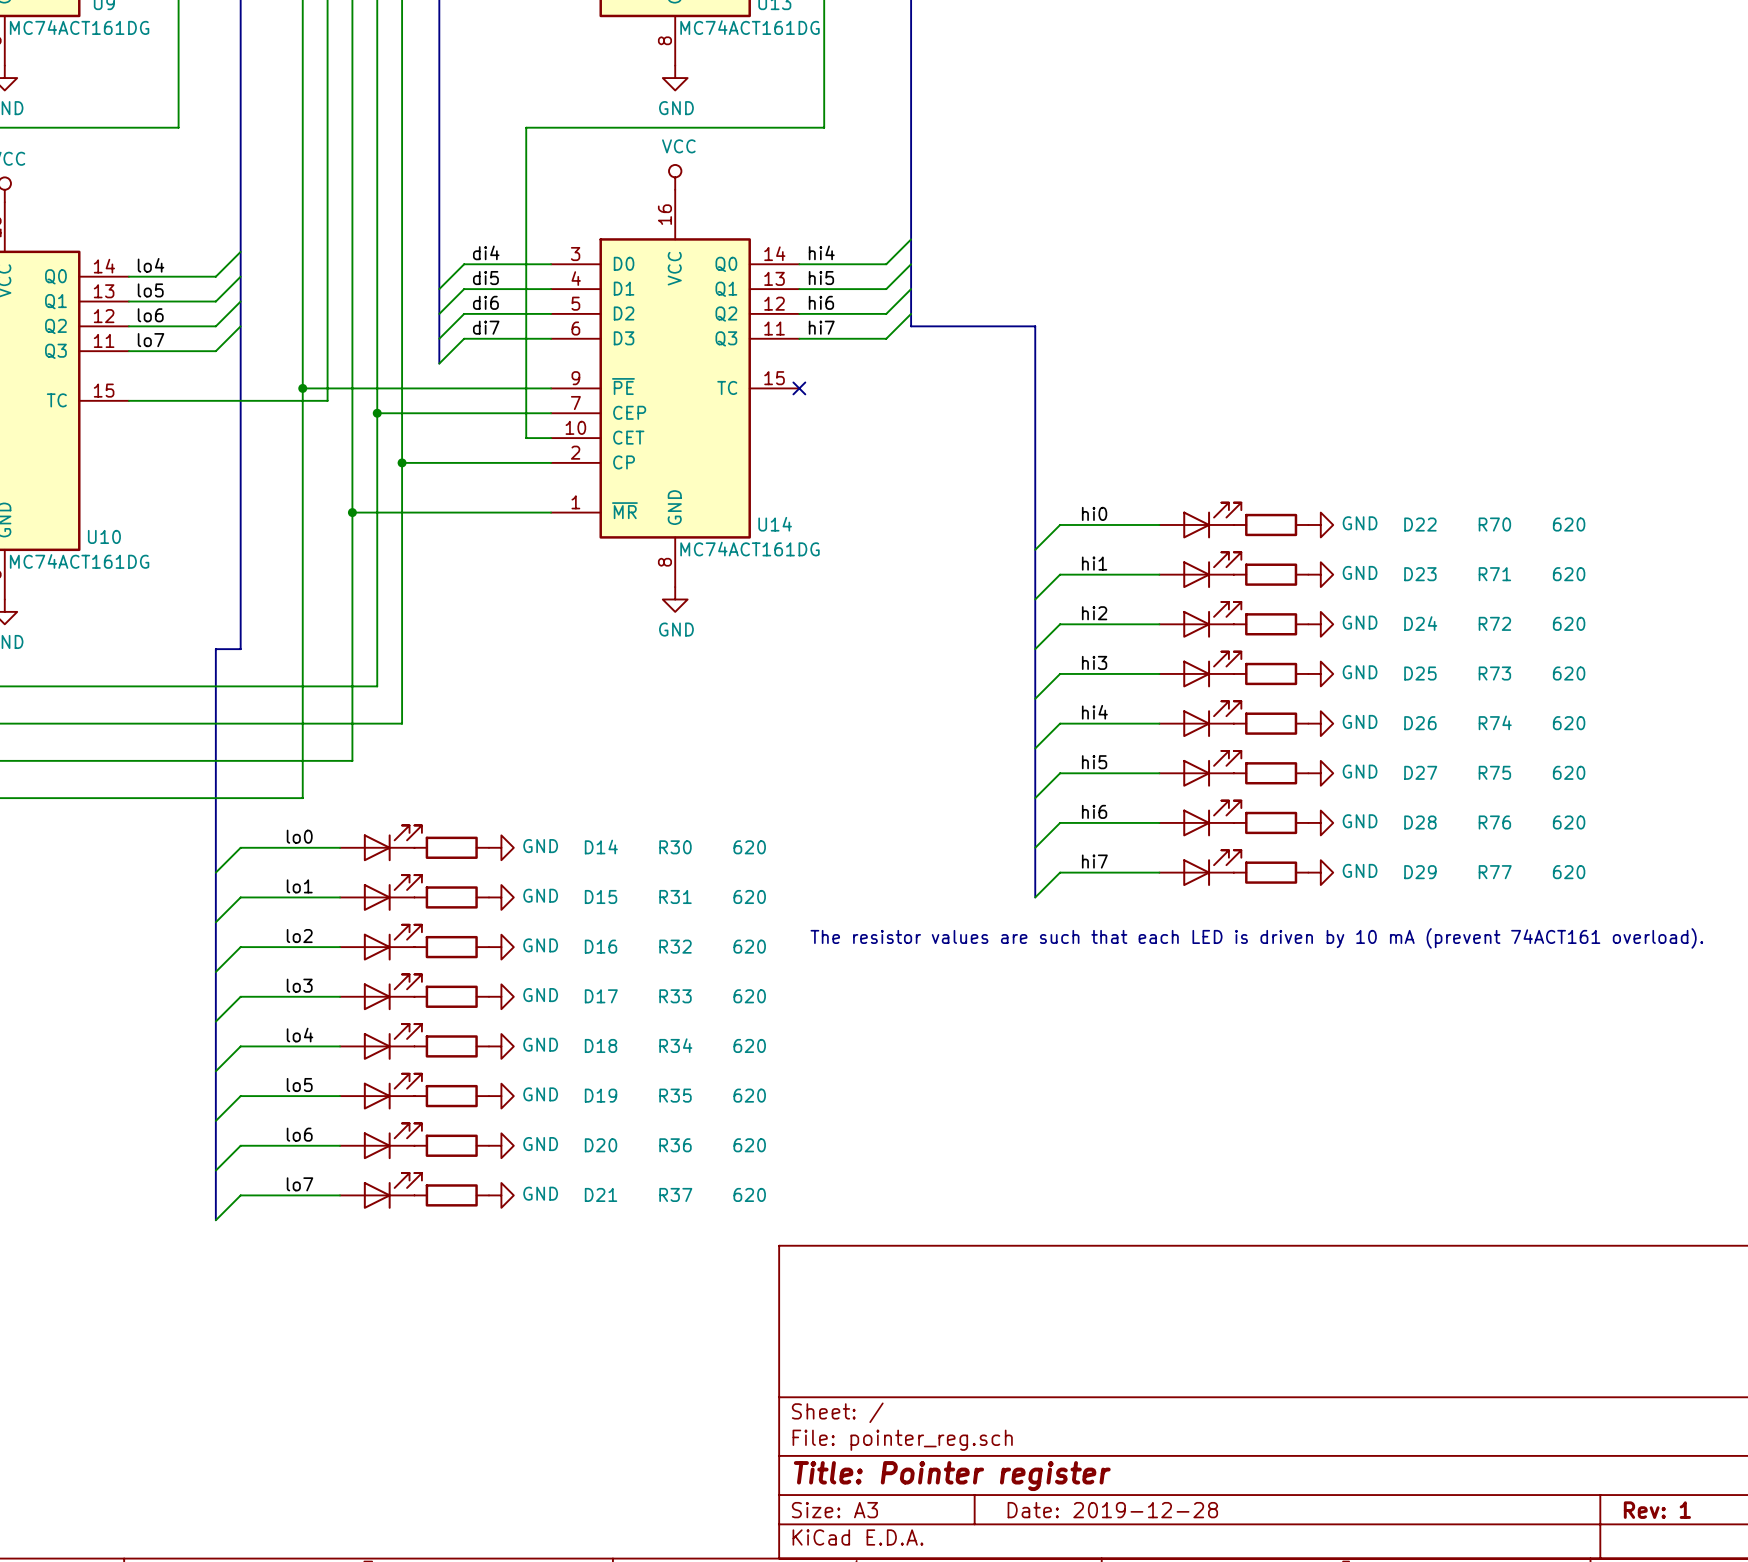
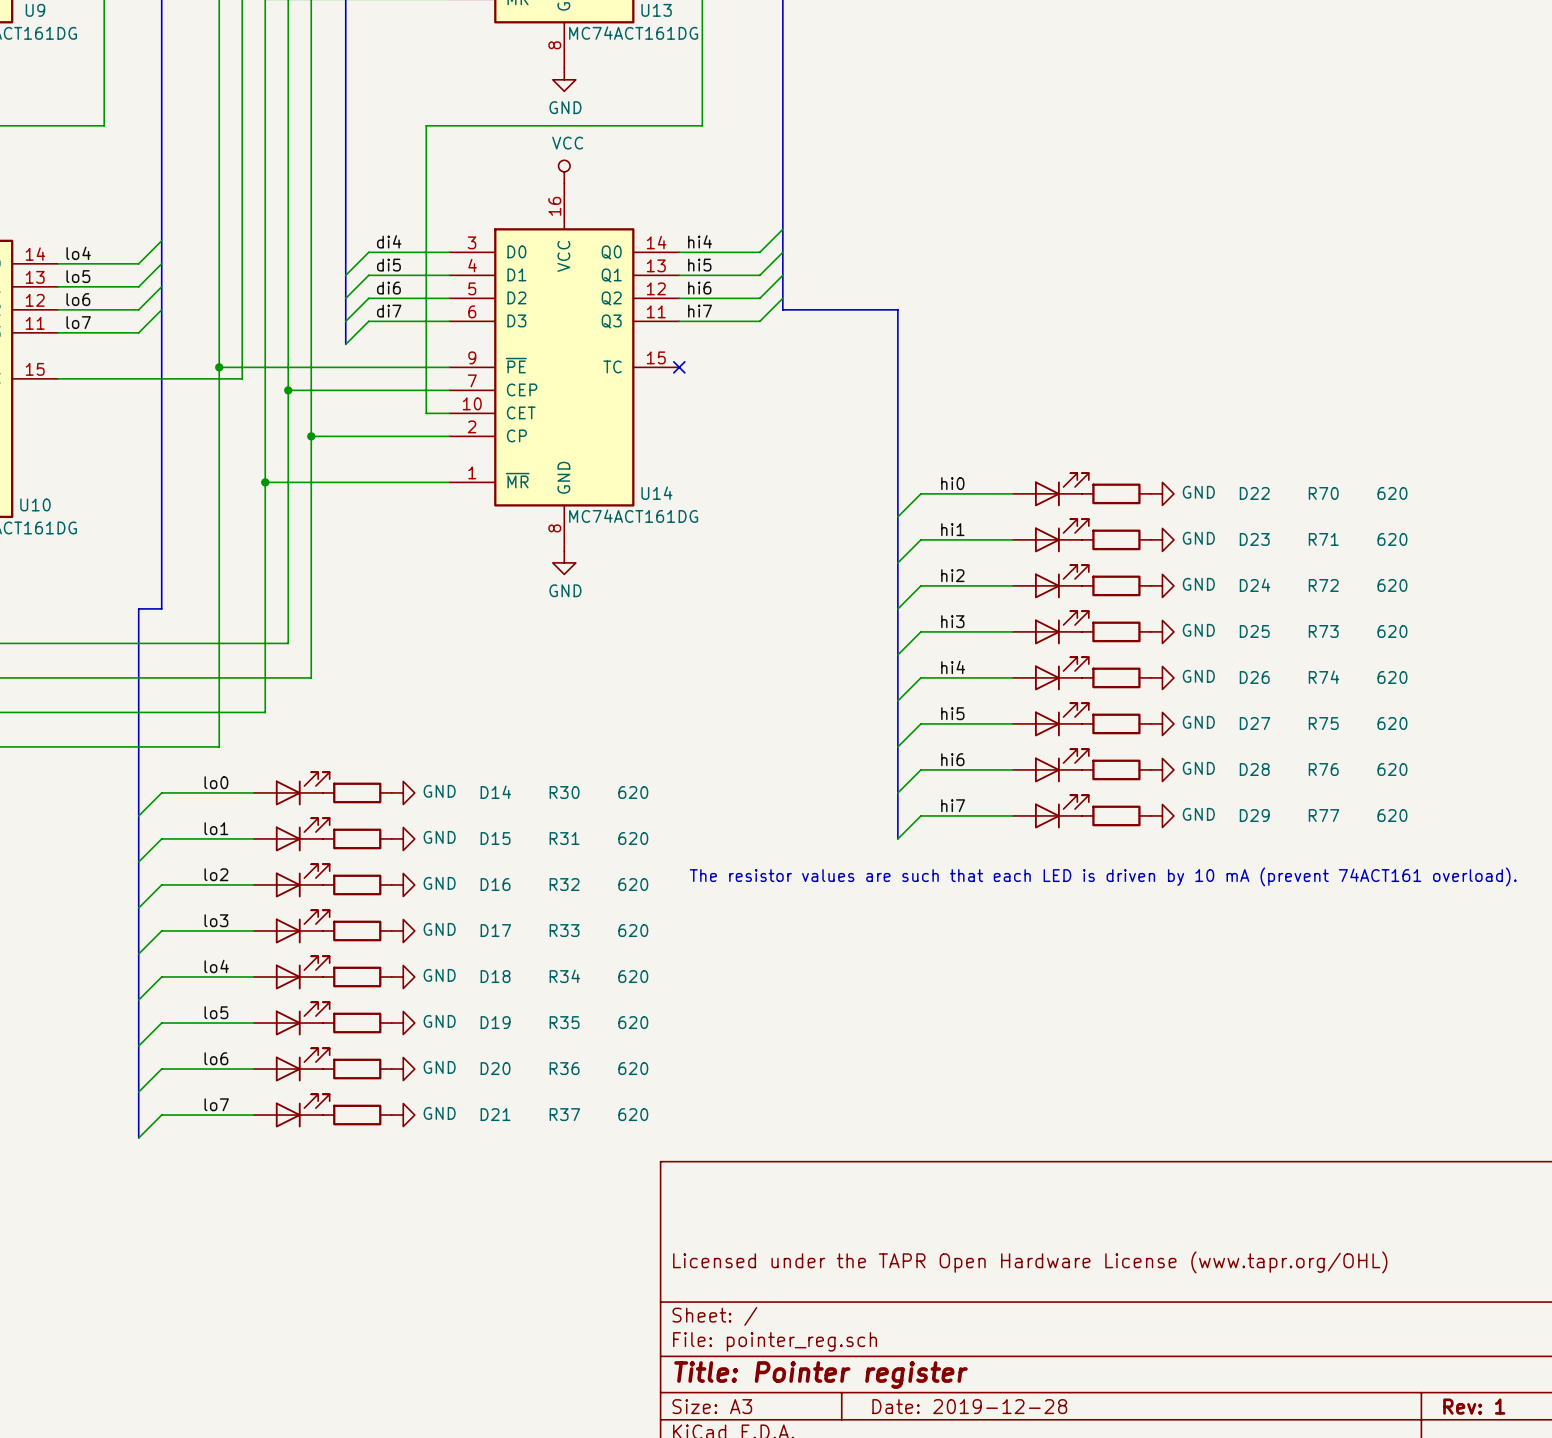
title block: none -> Licensed under the TAPR Open Hardware License (www.tapr.org/OHL) (1030, 1262)

